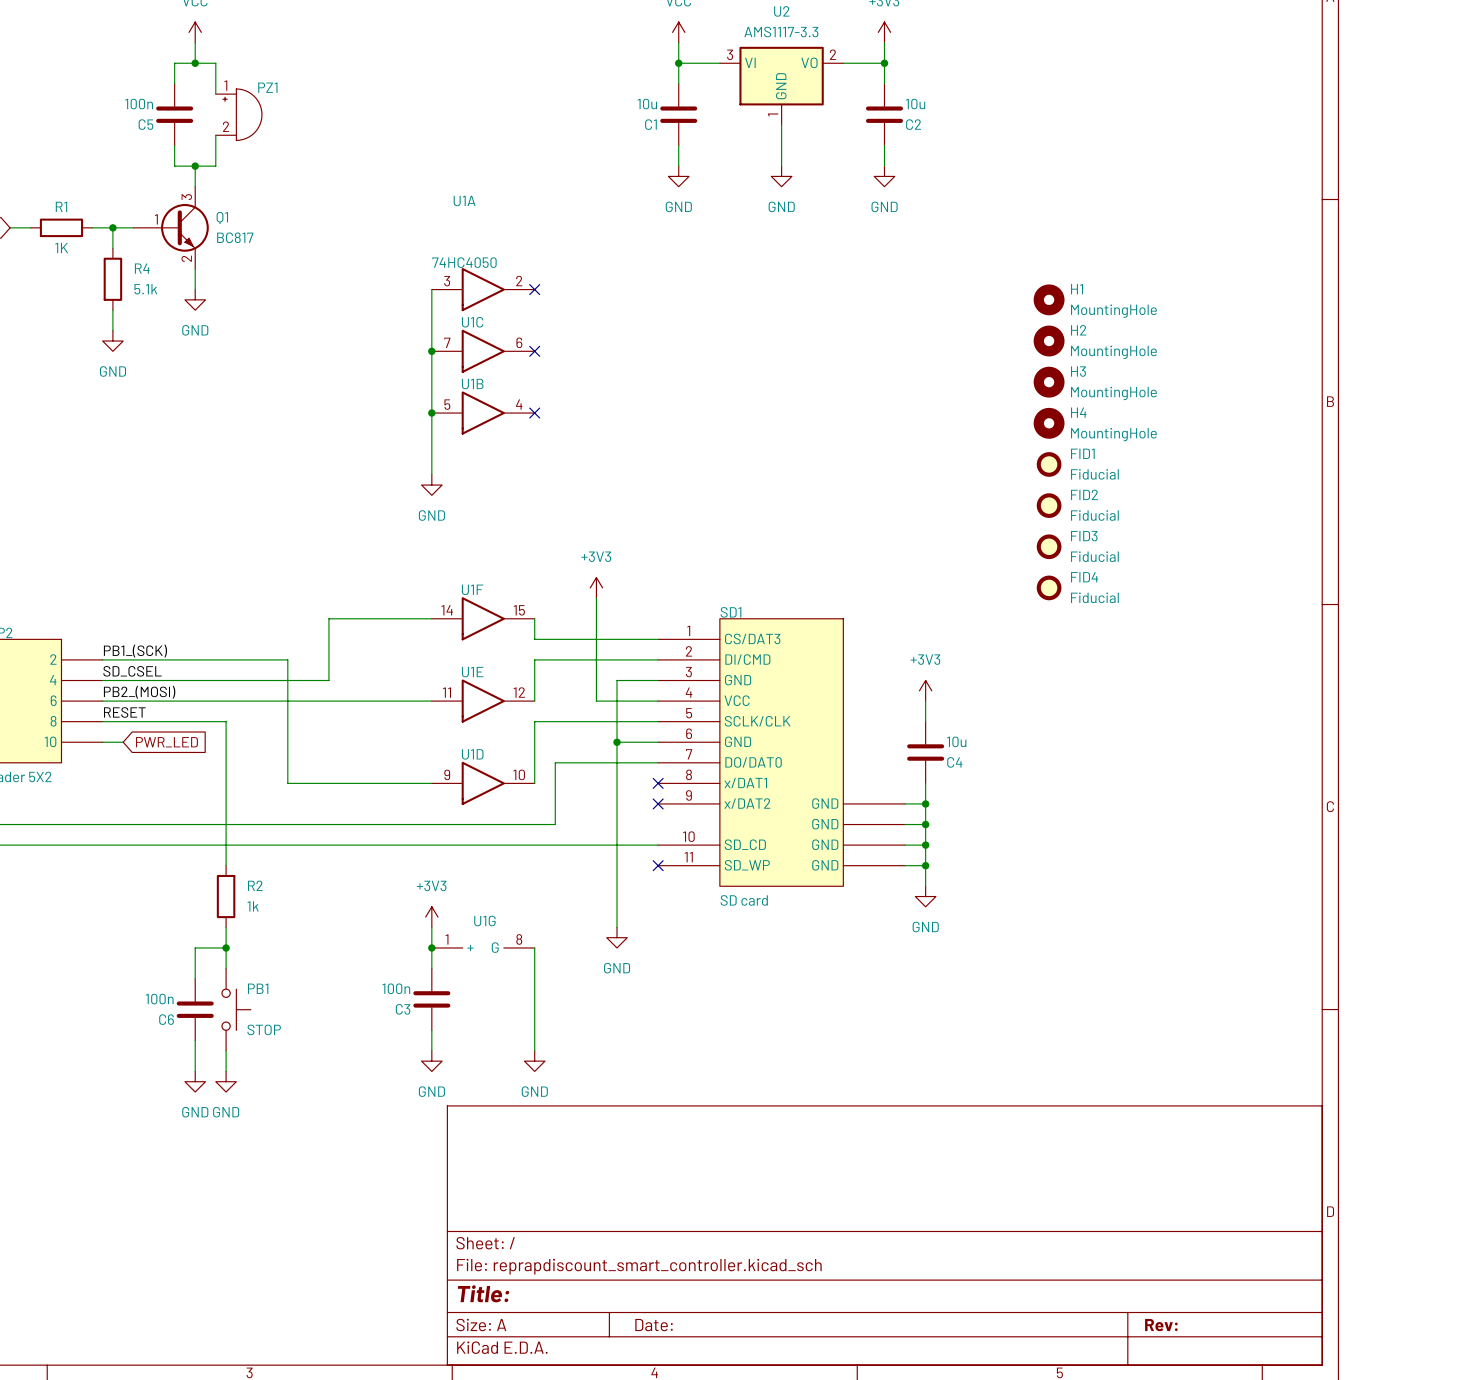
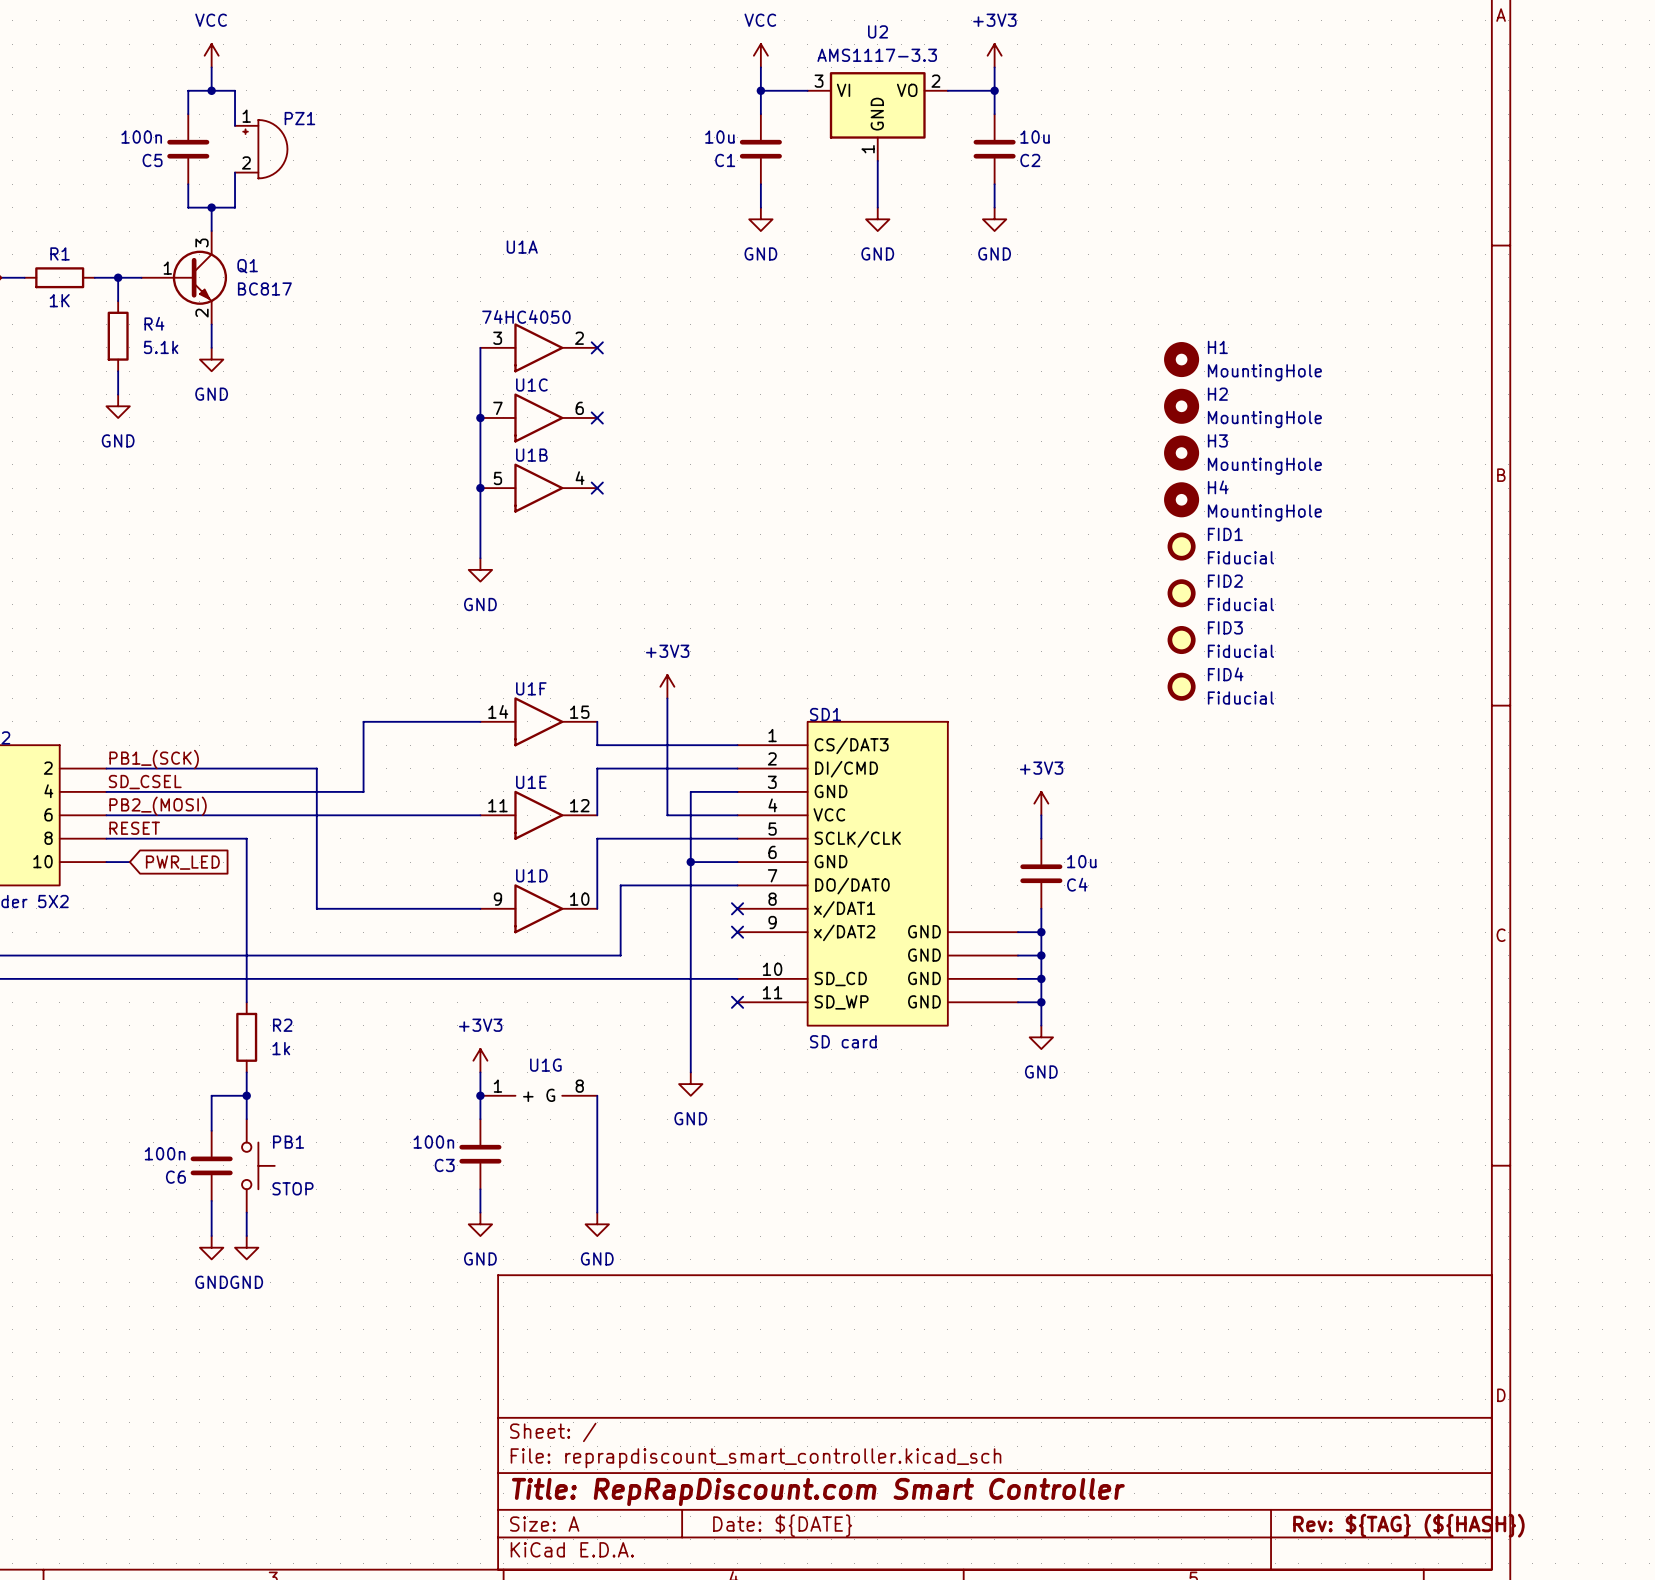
title block: Title: (483, 1293) -> Title: RepRapDiscount.com Smart Controller (818, 1491)
title block: Date: (654, 1325) -> Date: ${DATE} (782, 1525)
title block: Rev: (1161, 1325) -> Rev: ${TAG} (${HASH}) (1408, 1525)

